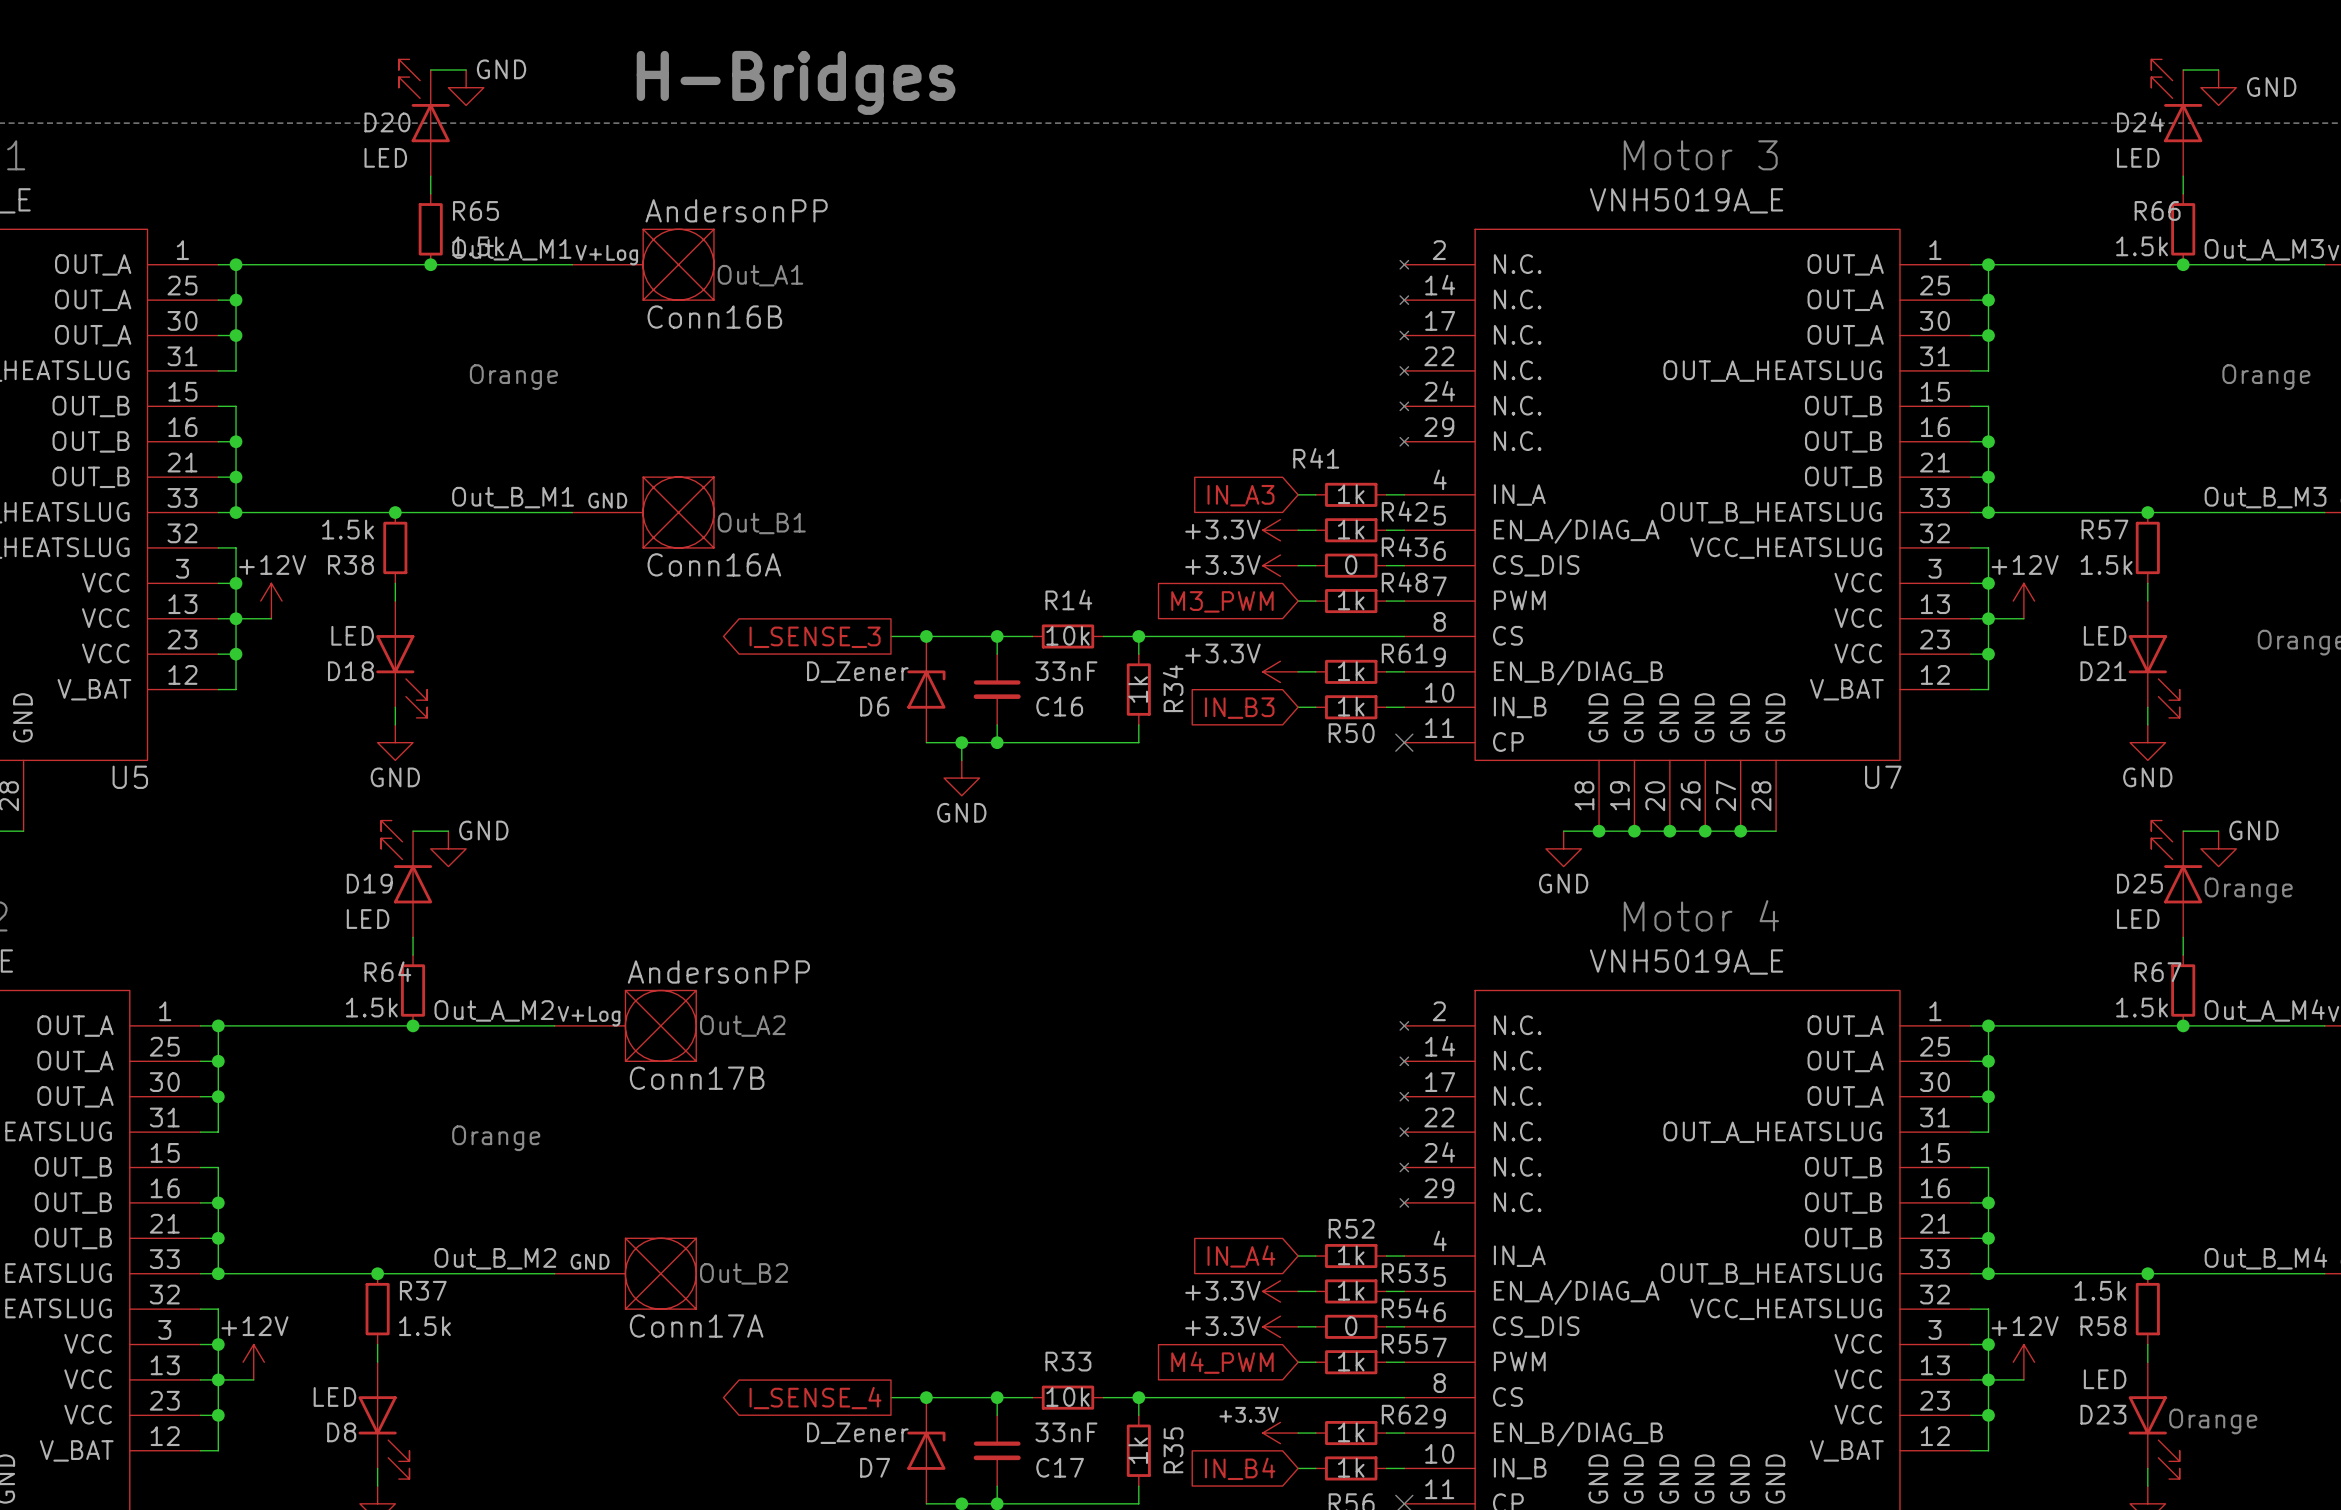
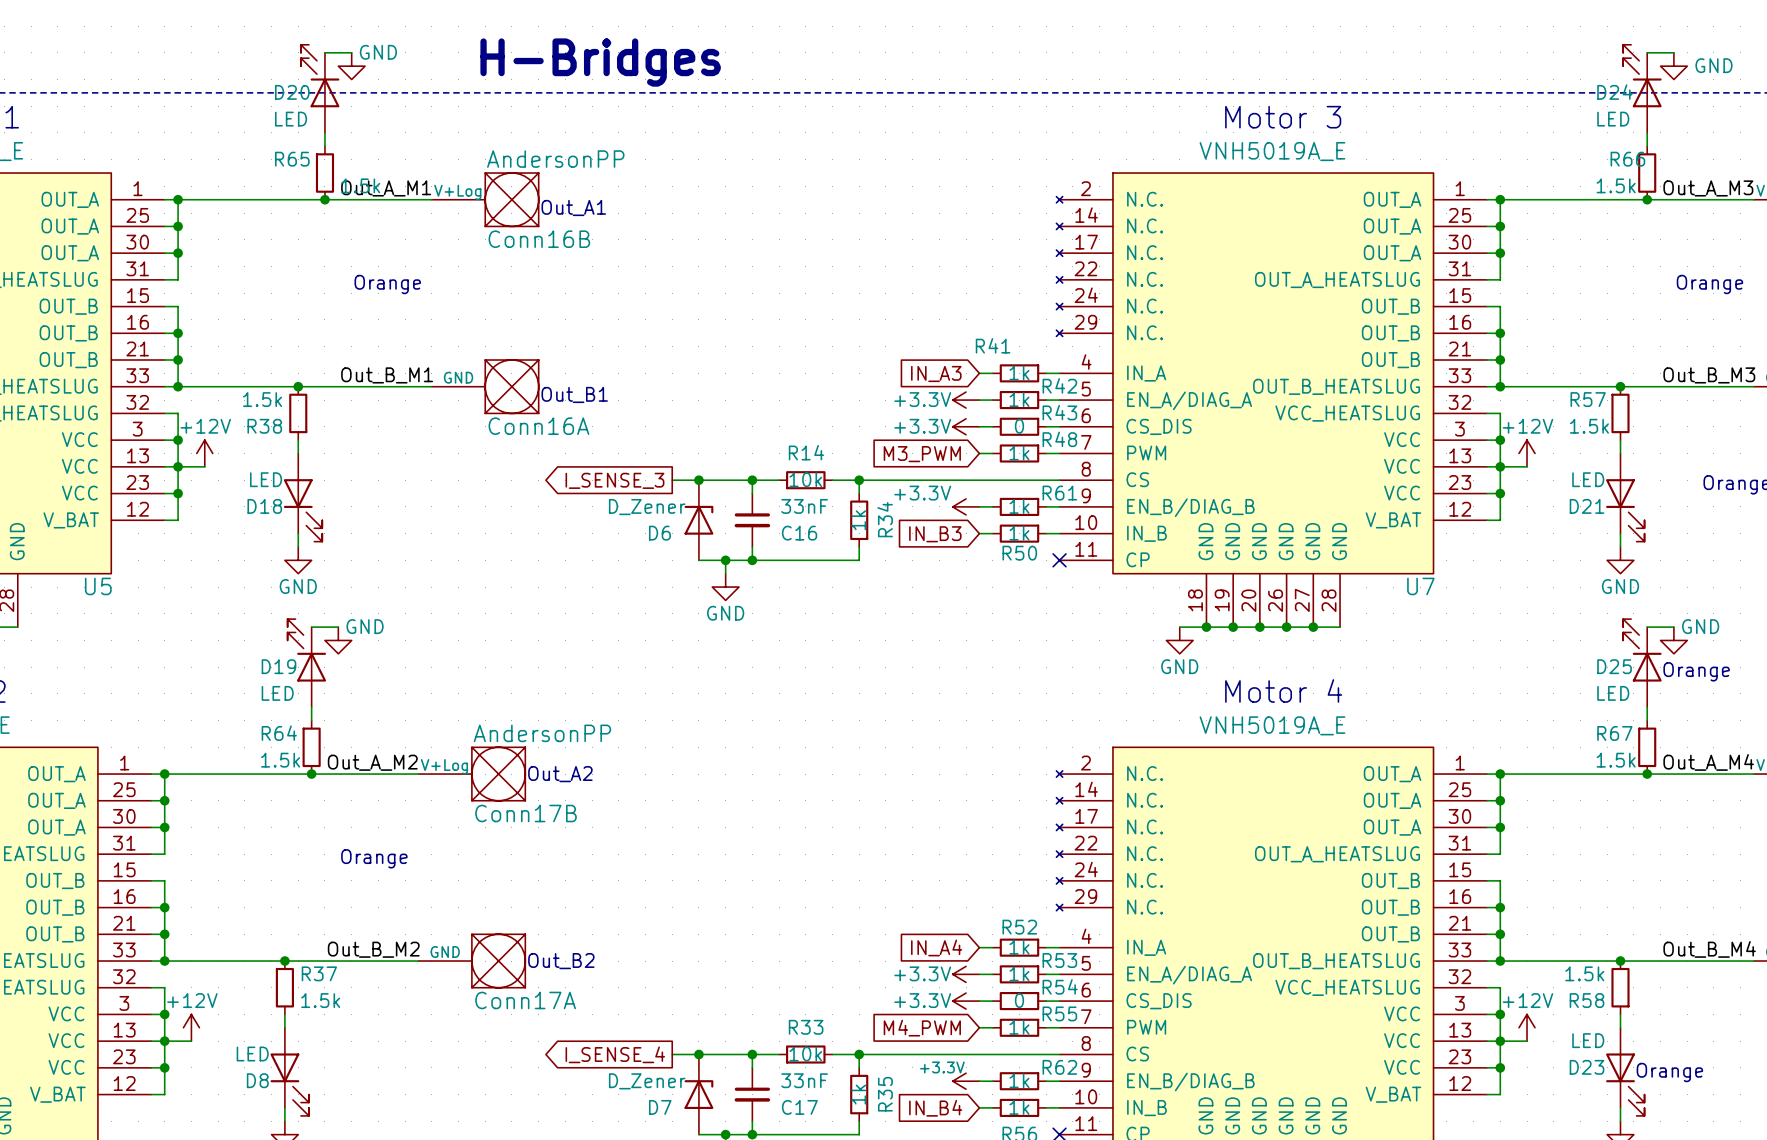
R65 name position: R65 (475, 210) -> R65 (292, 159)
R64 name position: R64 (387, 971) -> R64 (279, 733)
R67 name position: R67 (2158, 972) -> R67 (1614, 733)

